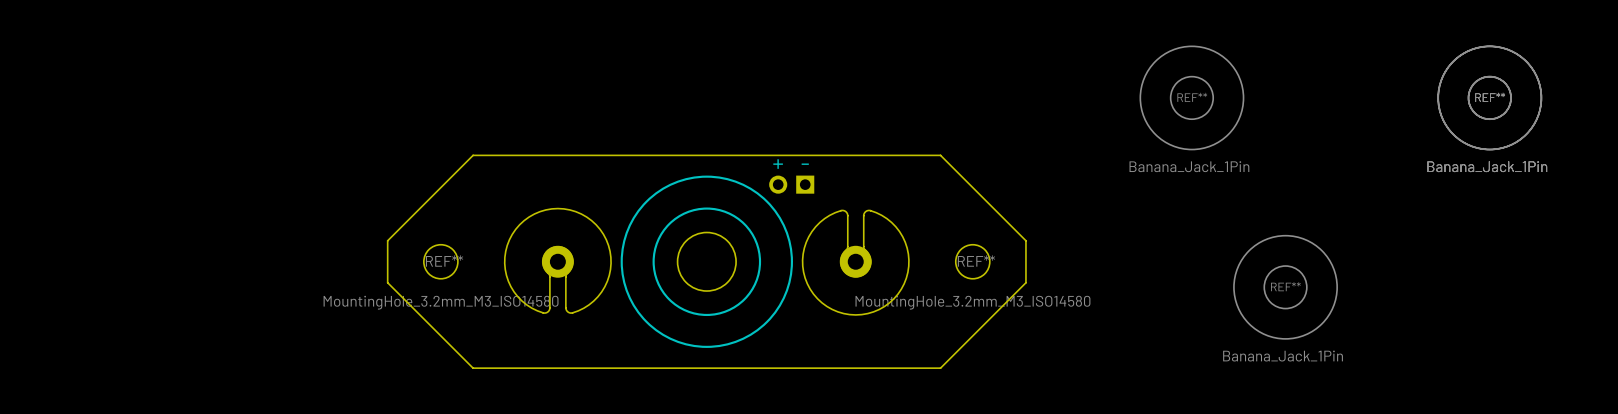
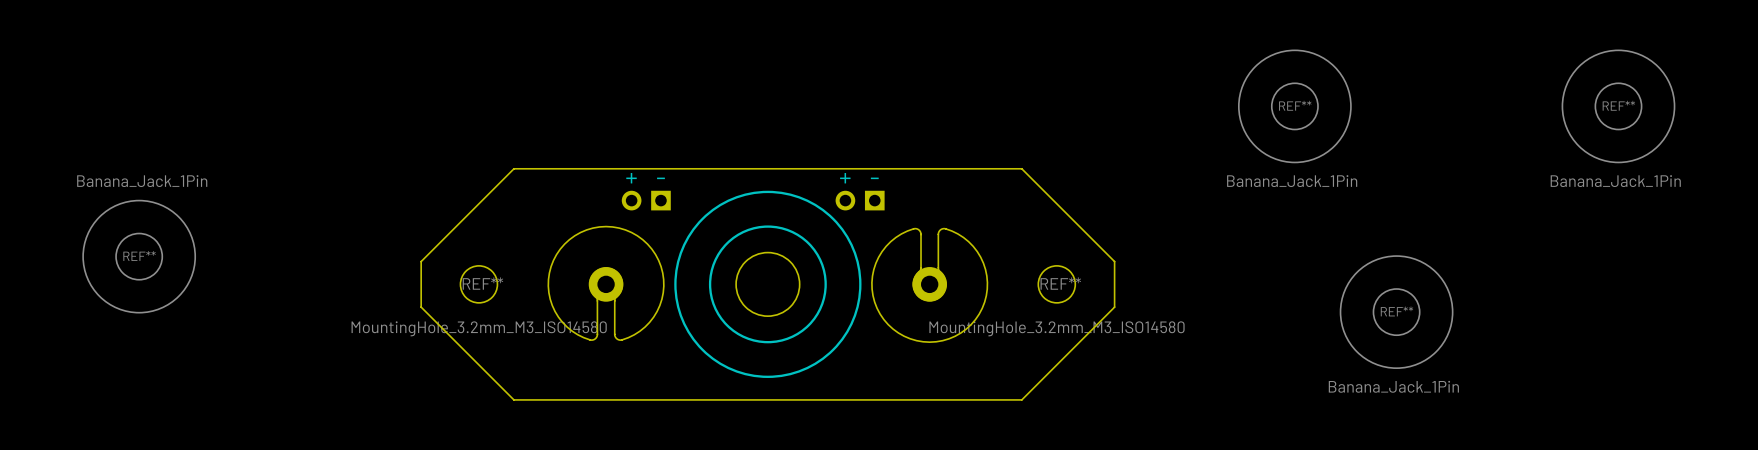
REF**: Banana_Jack_1Pin (1489, 97) -> none
text: none -> + (631, 178)
text: none -> - (660, 178)
part: none -> (646, 200)
REF**: none -> Banana_Jack_1Pin (139, 256)

